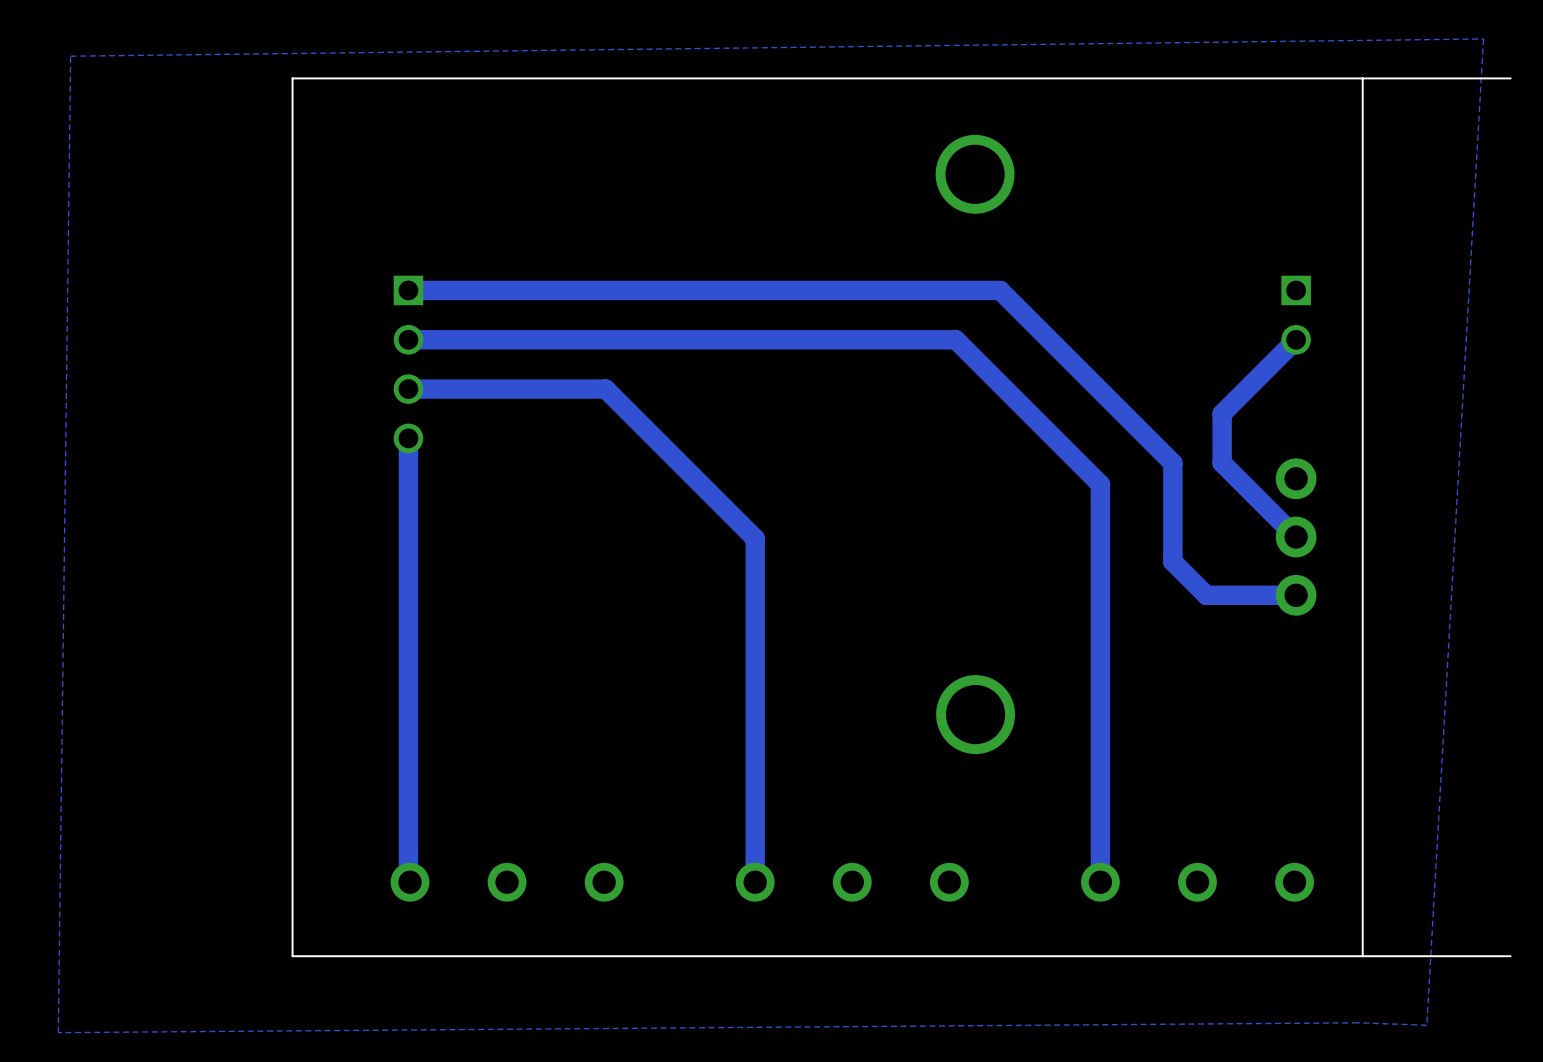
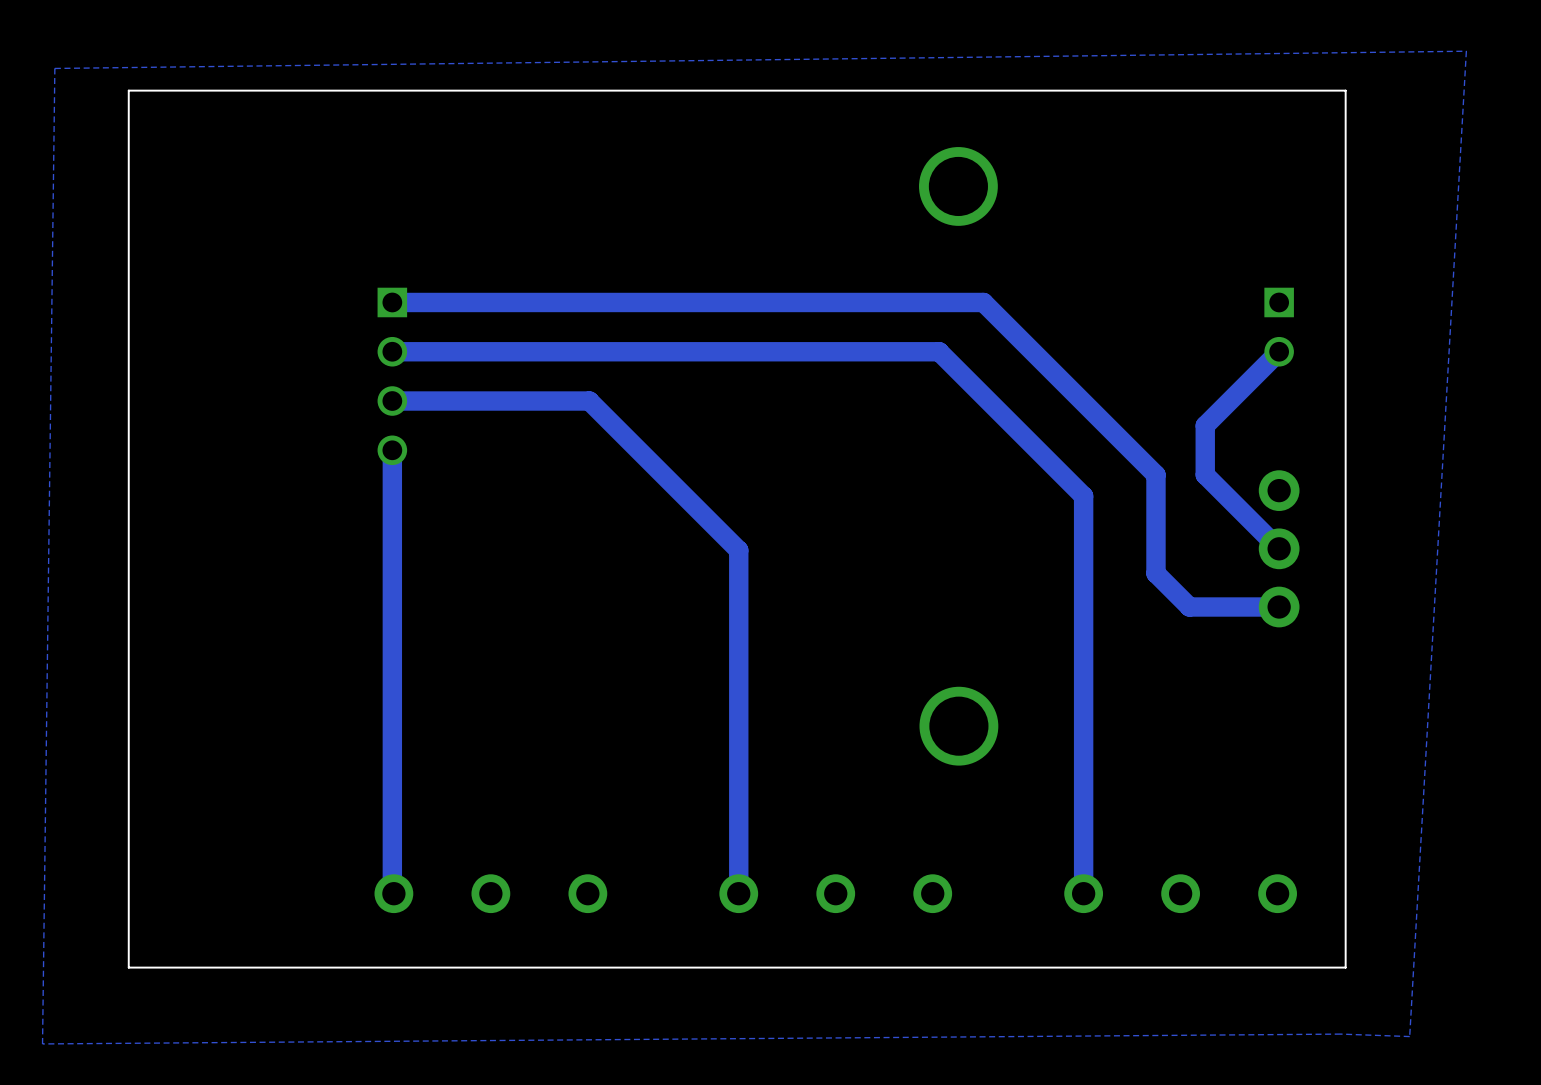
board edge: (292, 78) (292, 956) -> (276, 90) (128, 90) (128, 967) (276, 967)
board edge: (1510, 78) (1362, 78) -> none
board edge: (1510, 956) (1362, 956) -> none

